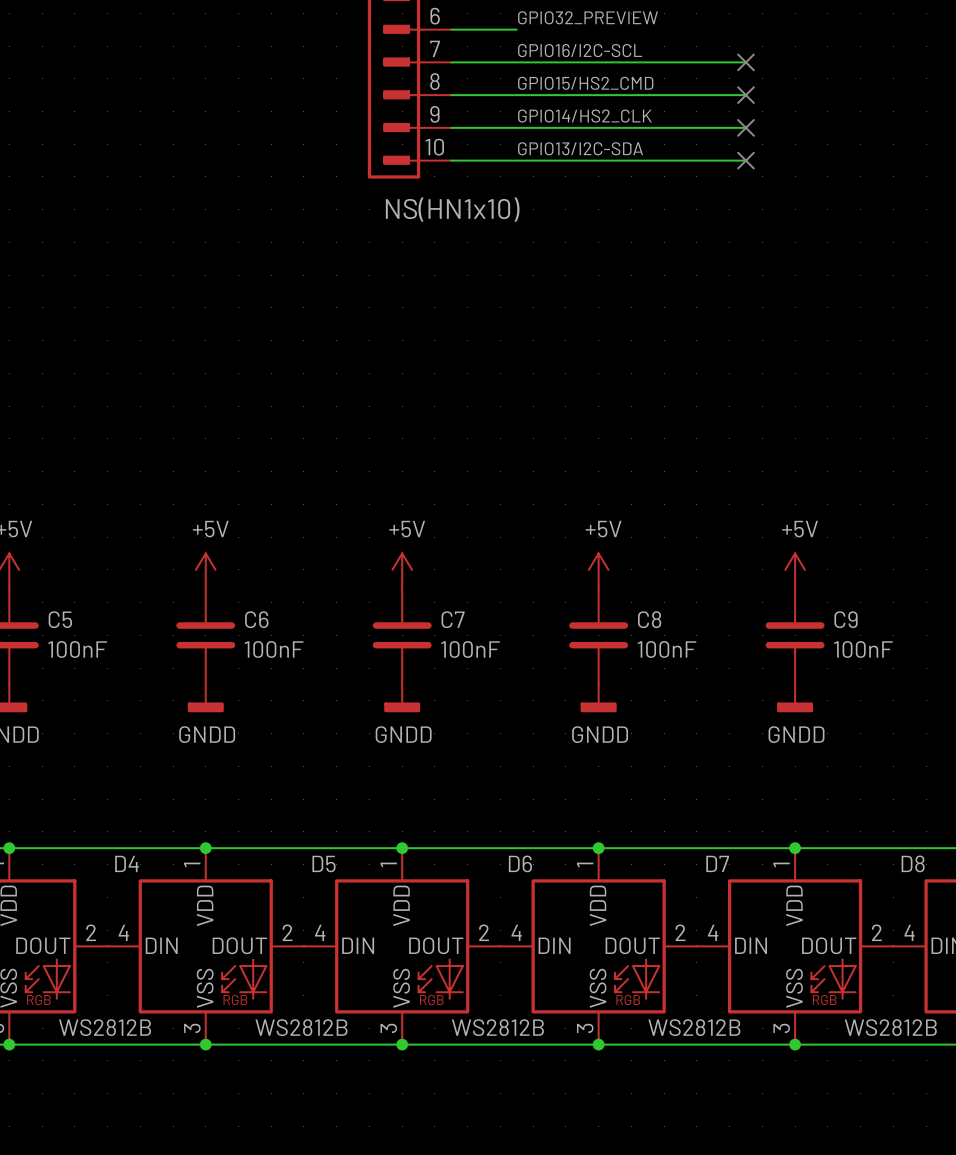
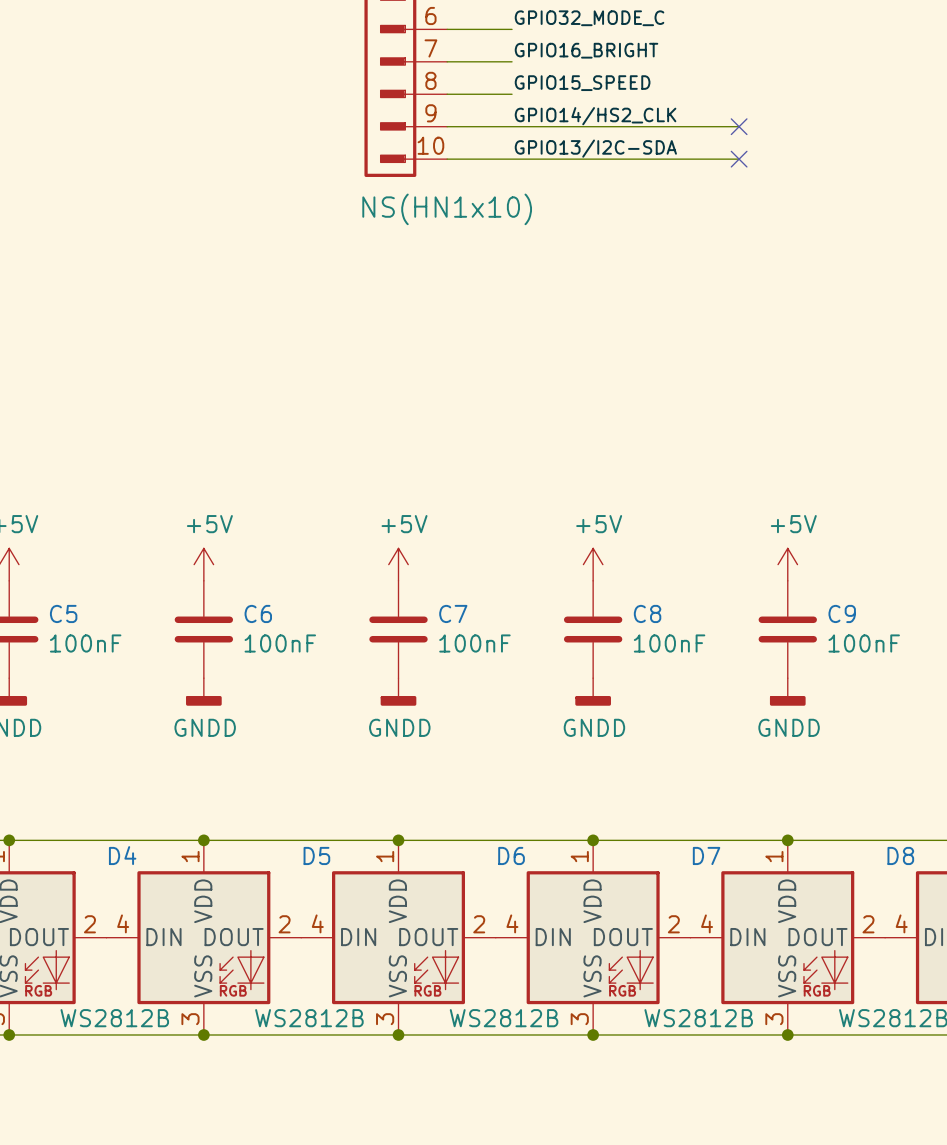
label: GPIO32_PREVIEW (587, 17) -> GPIO32_MODE_C (589, 18)
label: GPIO16/I2C-SCL (580, 50) -> GPIO16_BRIGHT (586, 50)
wire: (516, 62) (745, 62) -> none
no-connect mark: (745, 62) -> none
label: GPIO15/HS2_CMD (585, 83) -> GPIO15_SPEED (582, 83)
wire: (516, 95) (745, 95) -> none
no-connect mark: (745, 95) -> none

